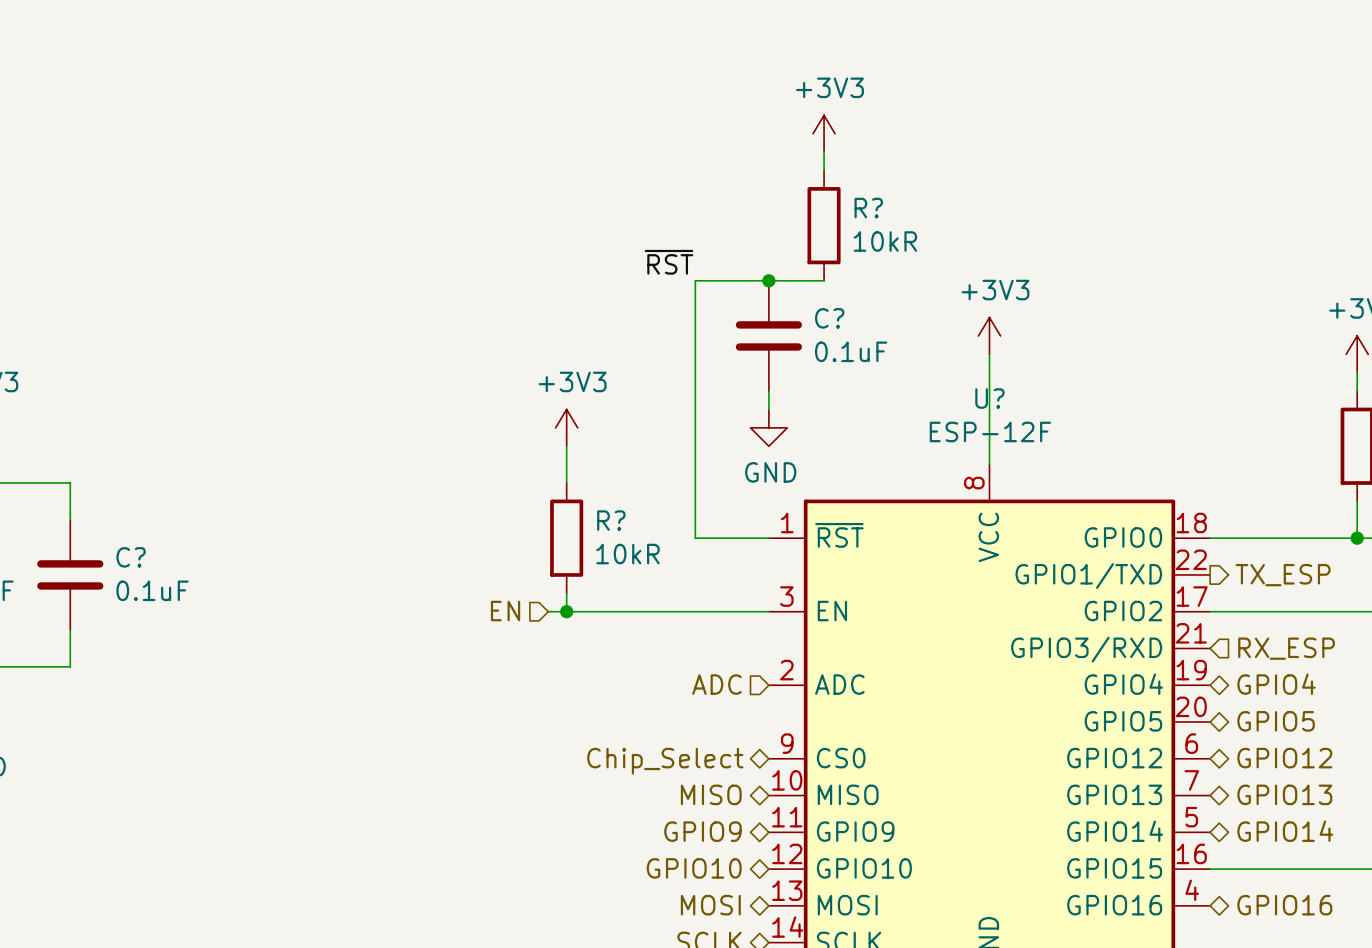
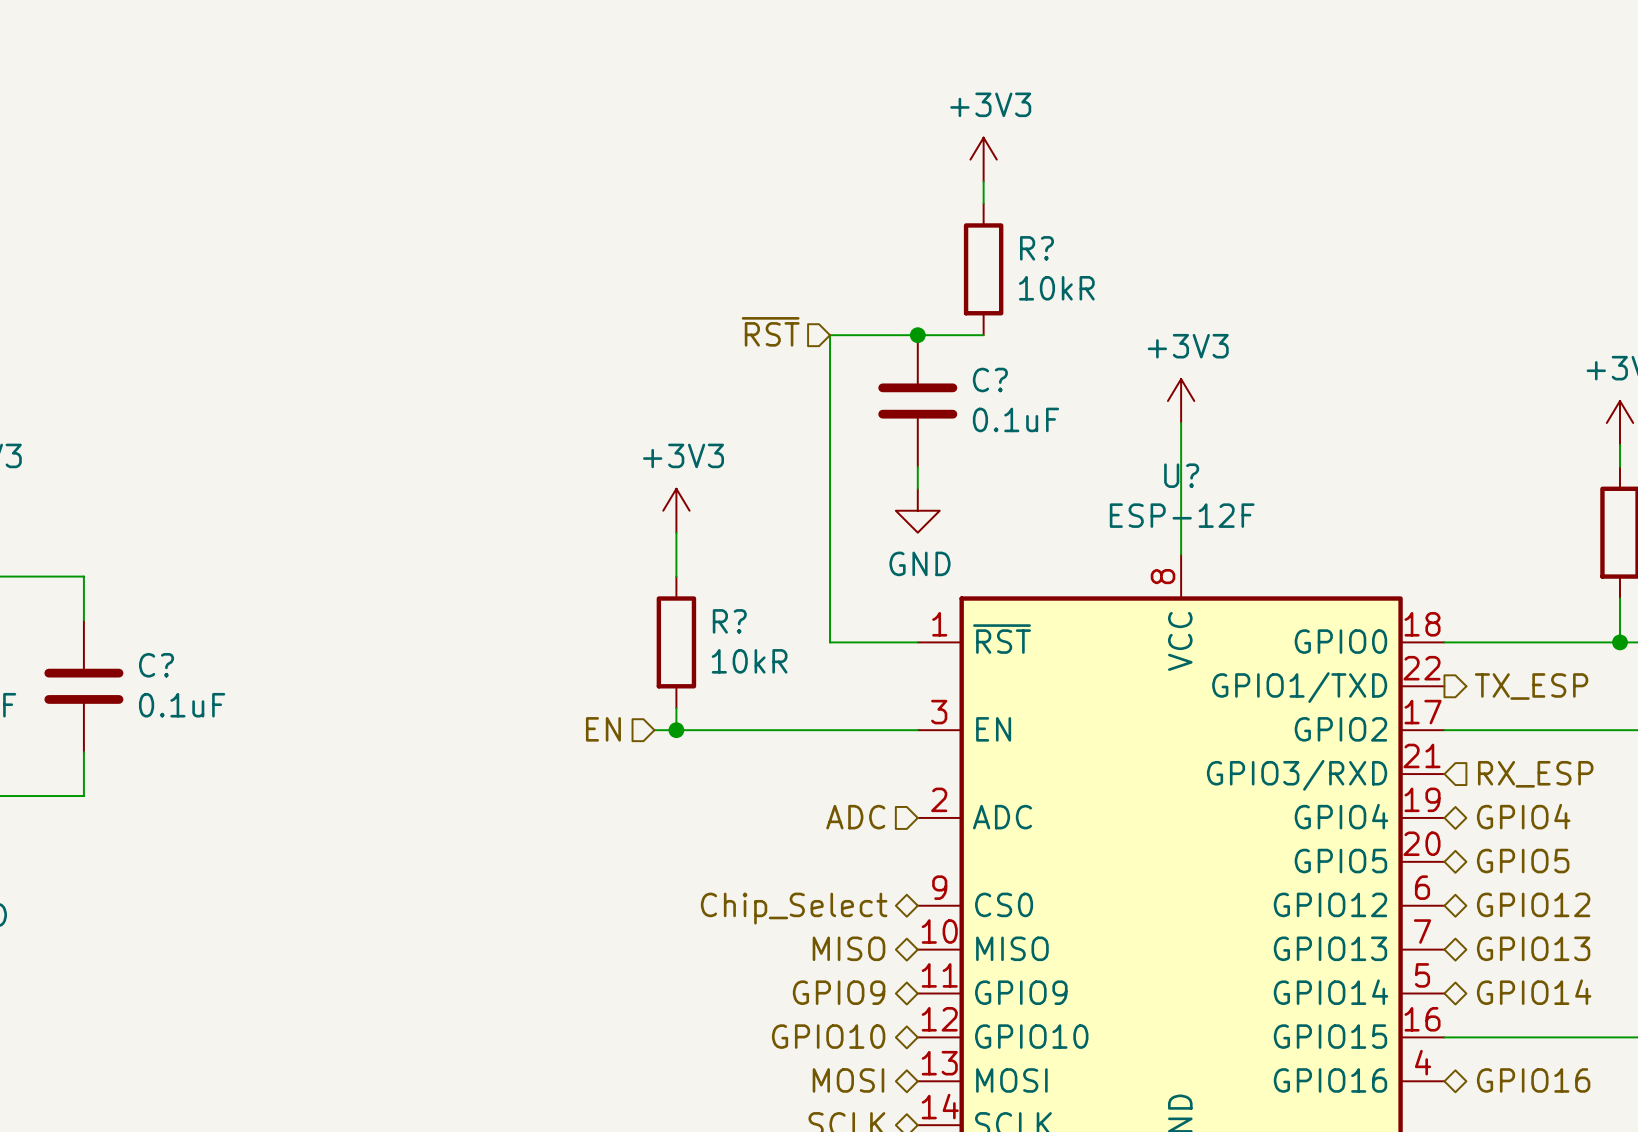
label: ~{RST} (669, 262) -> none
hierarchical label: none -> ~{RST} (770, 331)

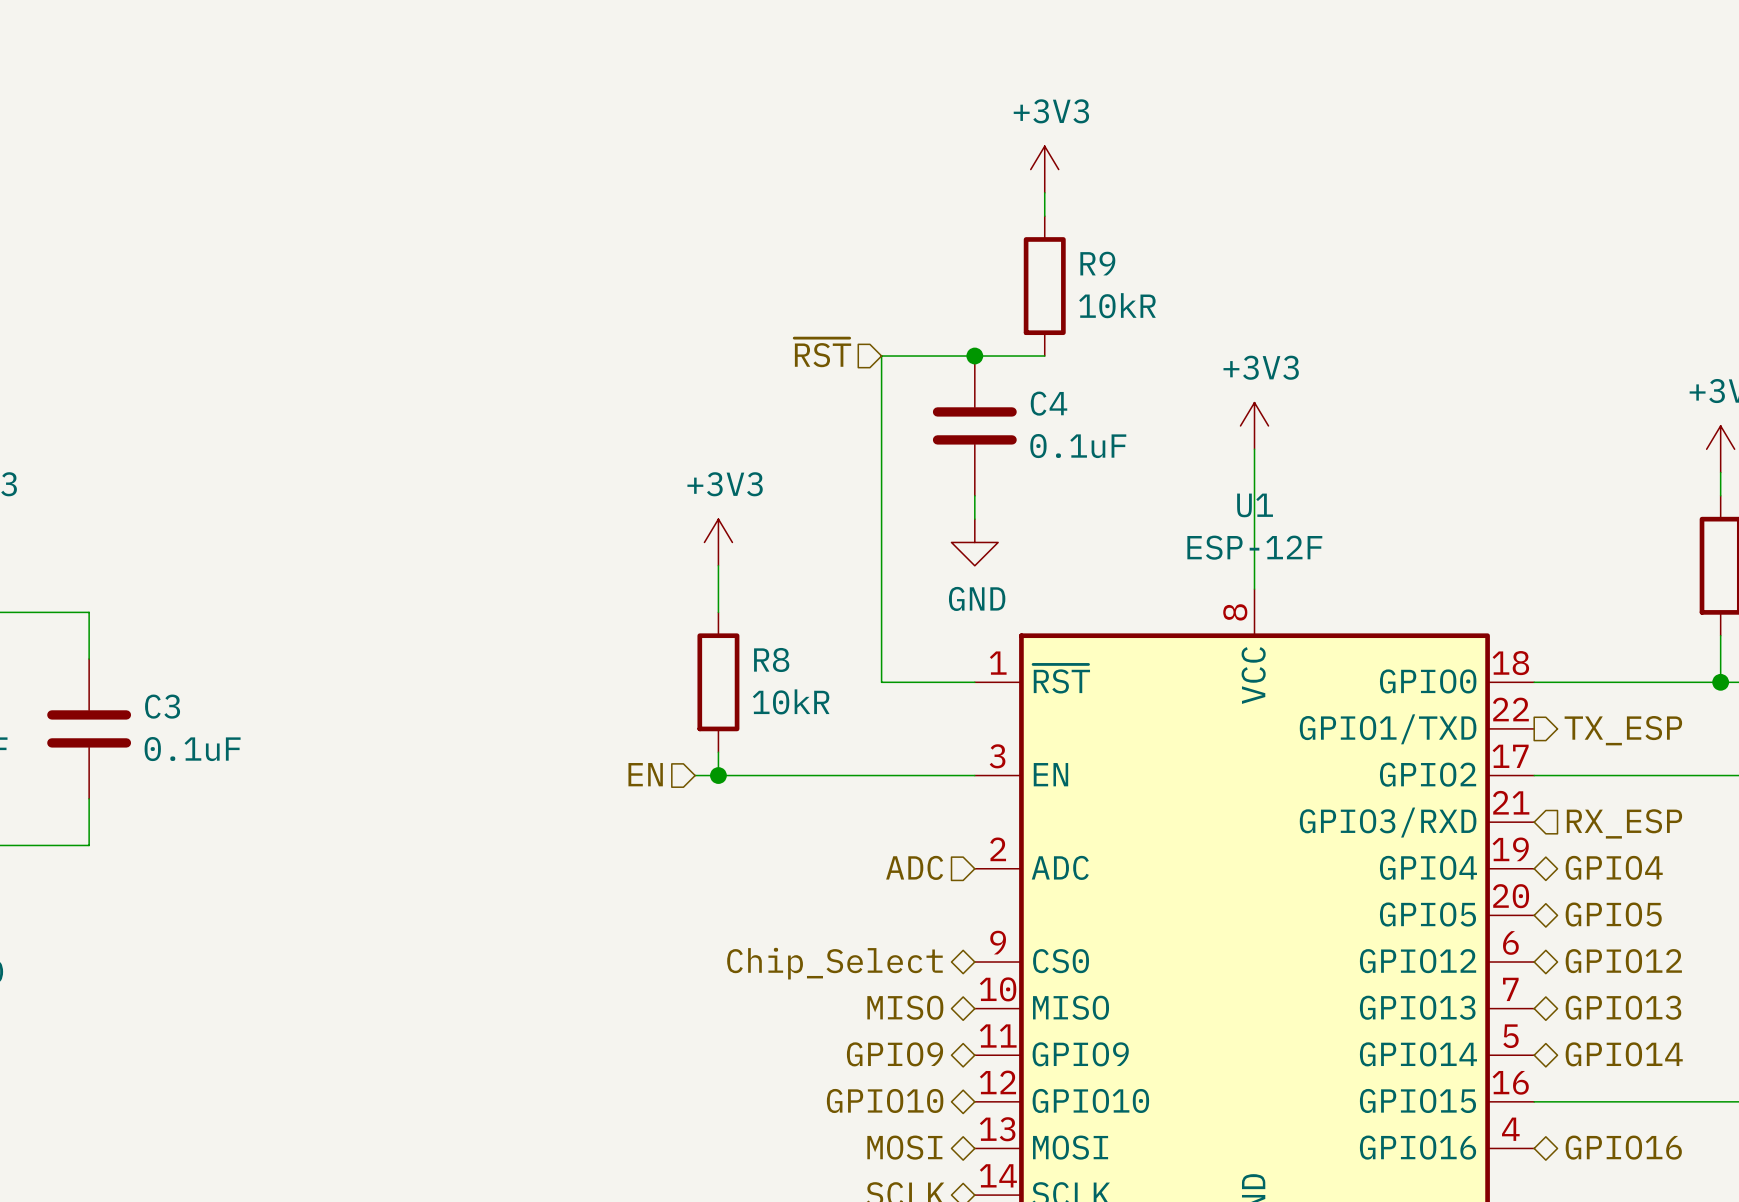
R? name: R? (1036, 248) -> R9 (1097, 263)
C? name: C? (990, 380) -> C4 (1048, 403)
U? name: U? (1181, 475) -> U1 (1255, 505)
R? name: R? (729, 621) -> R8 (771, 660)
C? name: C? (156, 665) -> C3 (162, 706)

